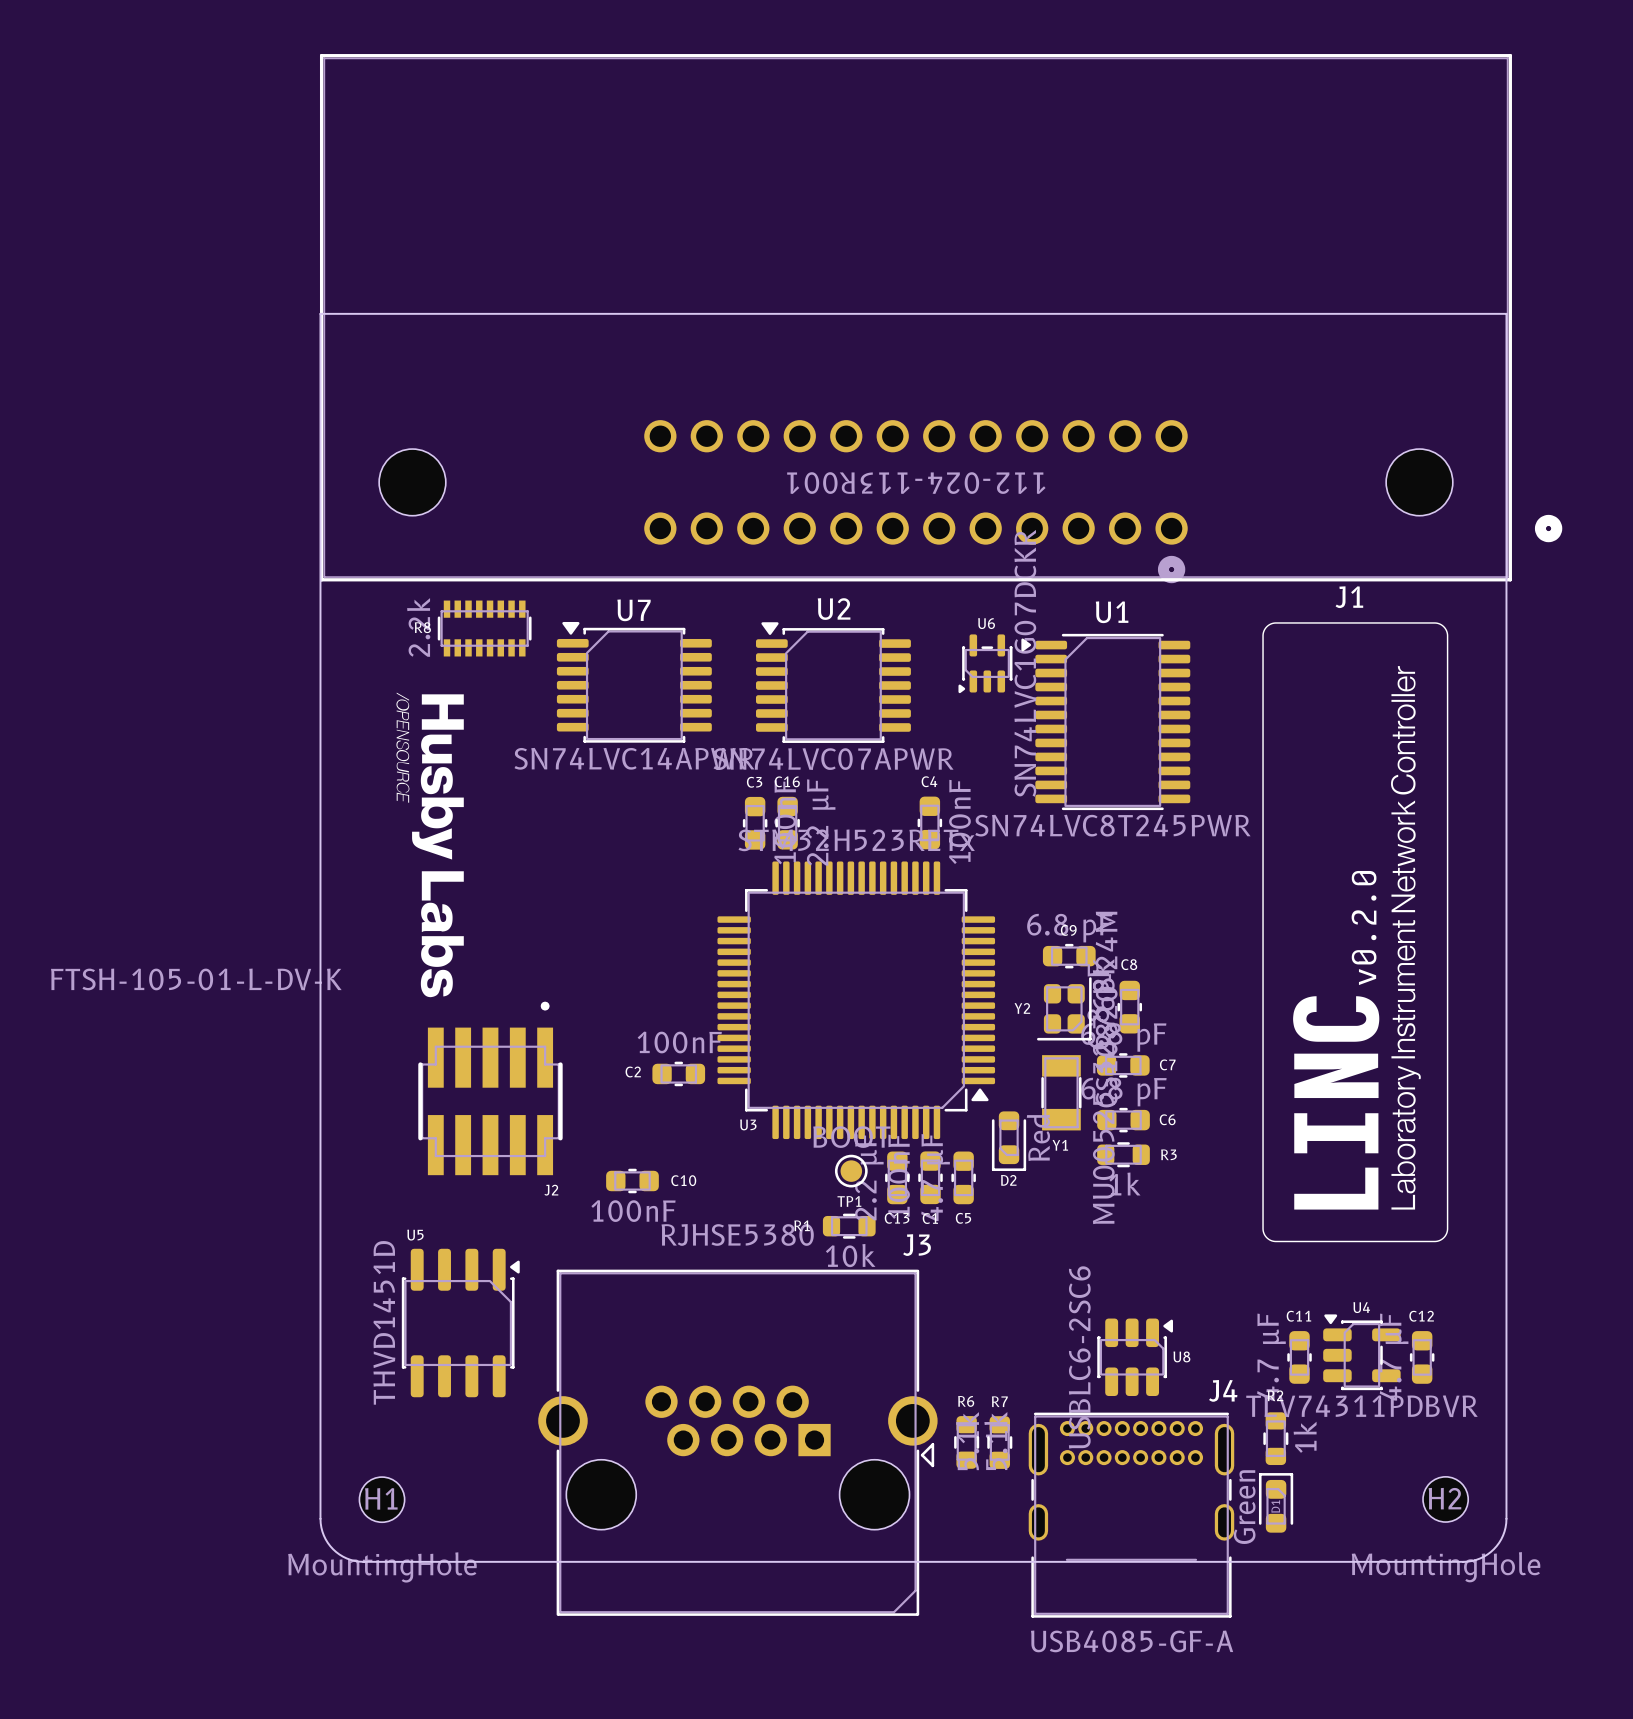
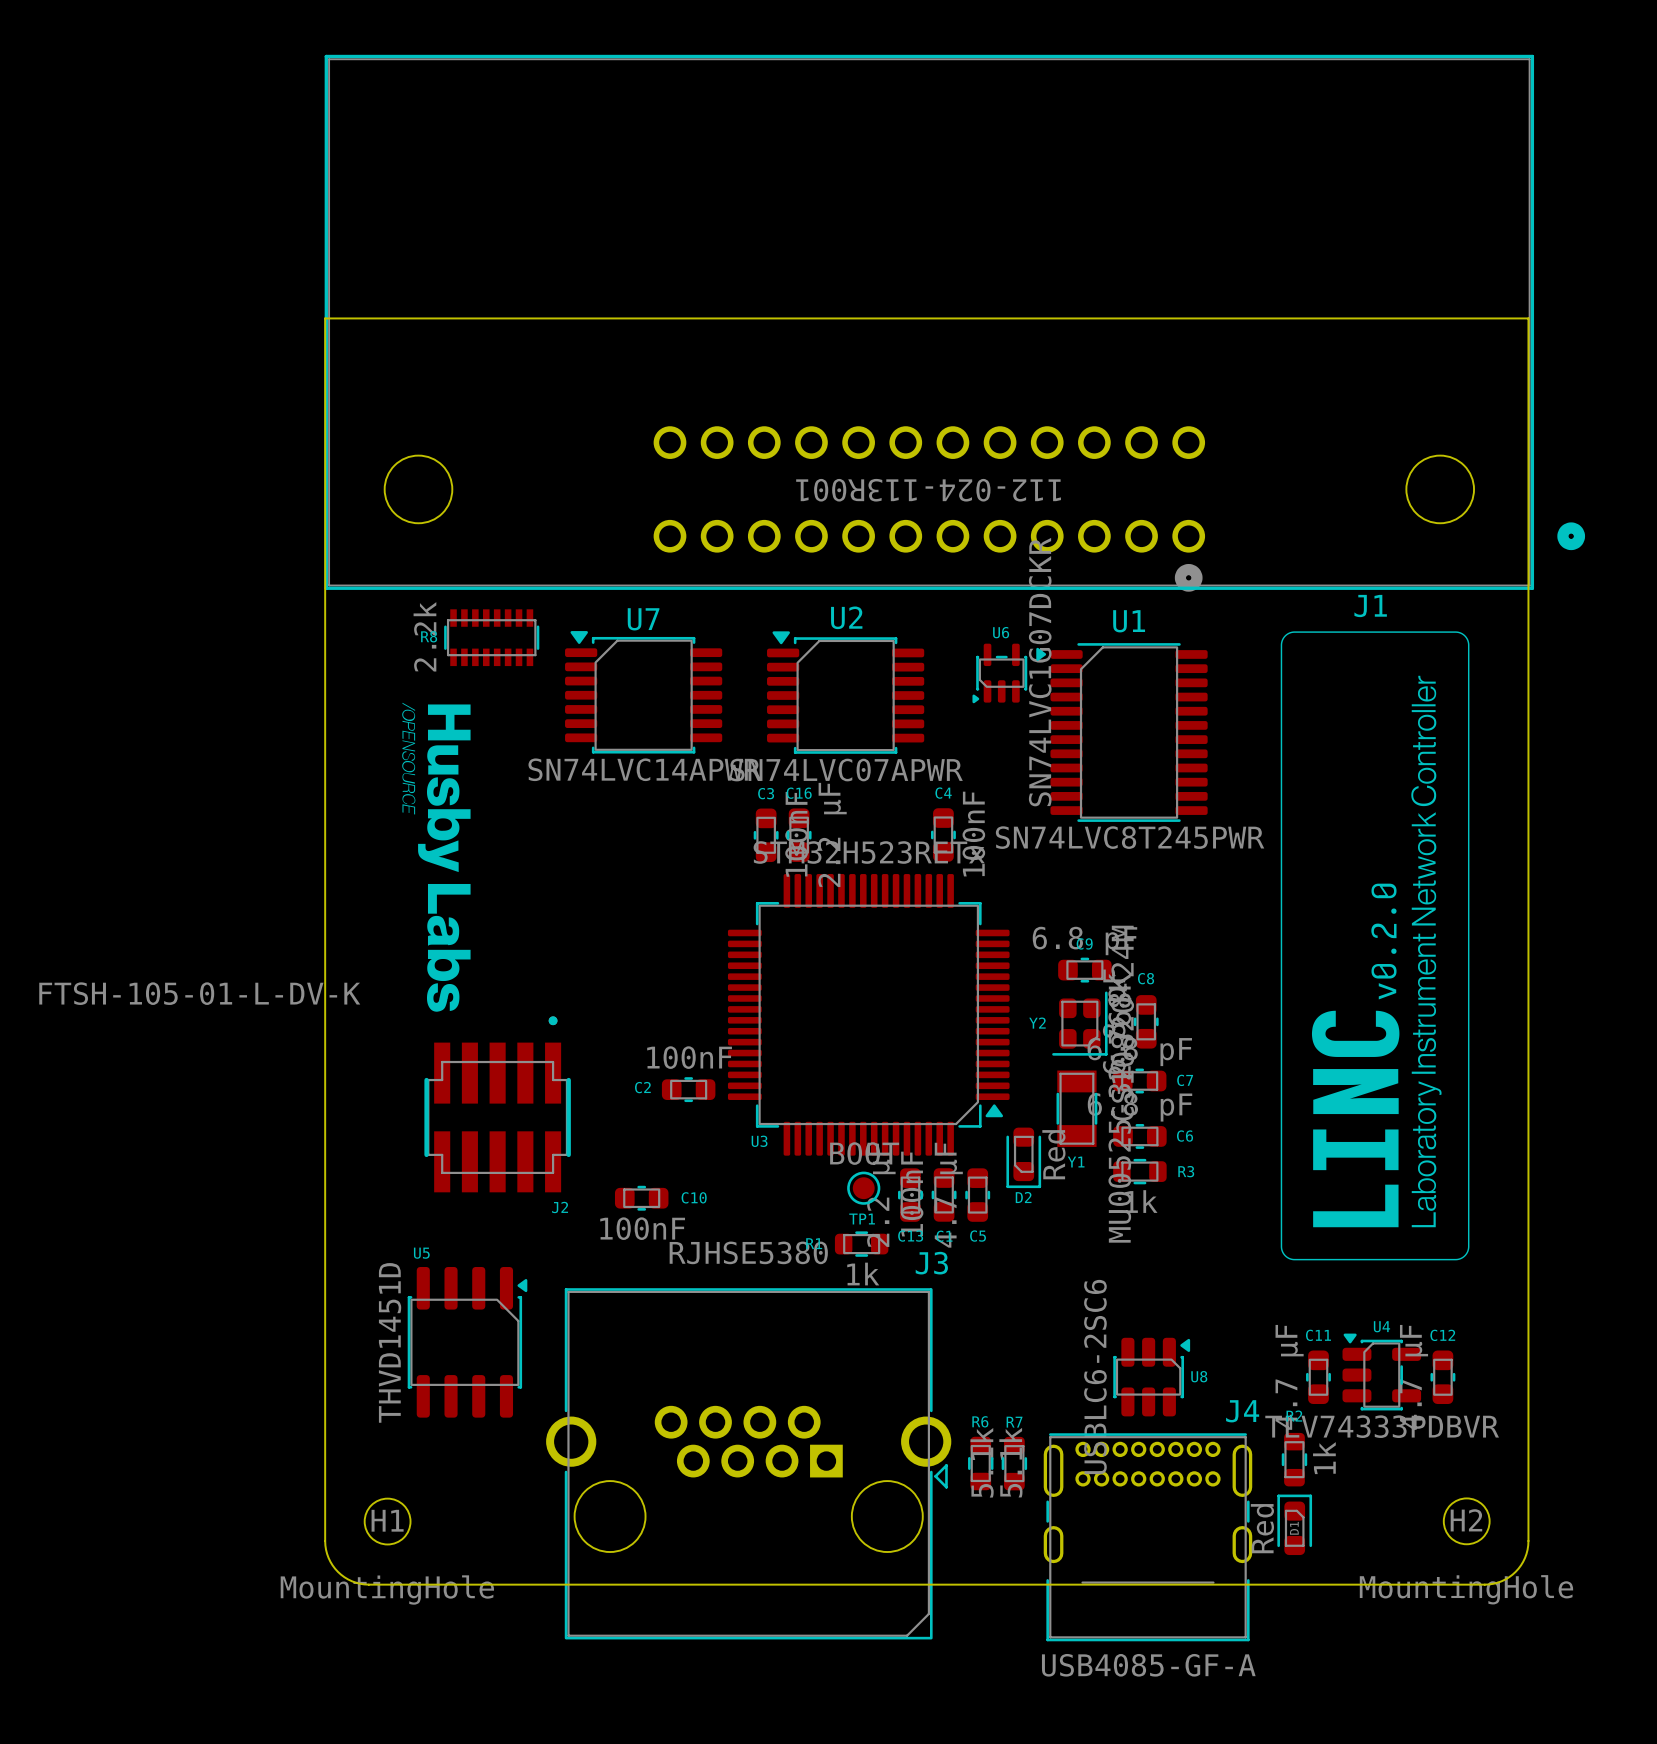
R1 value: 10k (850, 1255) -> 1k (863, 1274)
U4 value: TLV74311PDBVR (1362, 1406) -> TLV74333PDBVR (1382, 1426)
D1 value: Green (1244, 1507) -> Red (1262, 1528)

